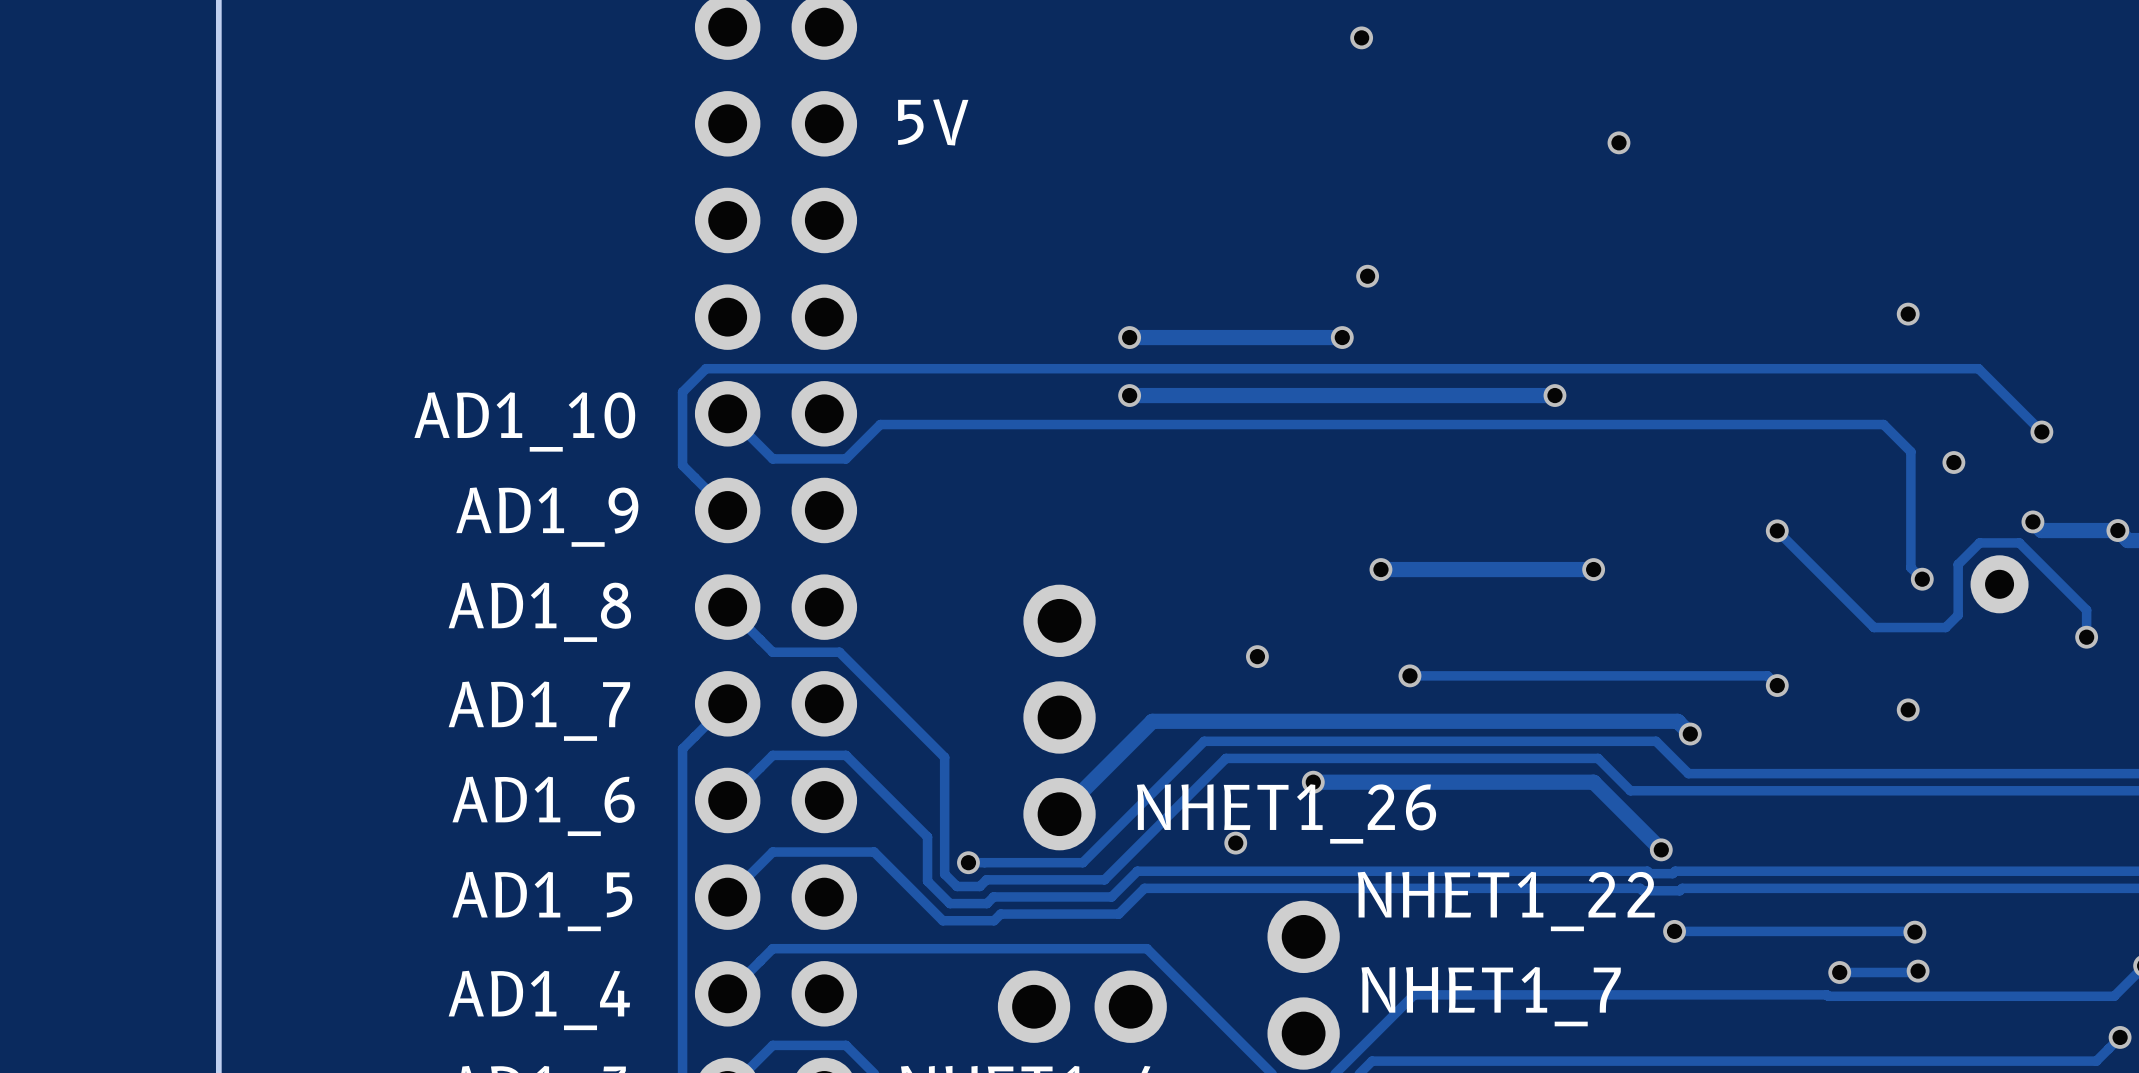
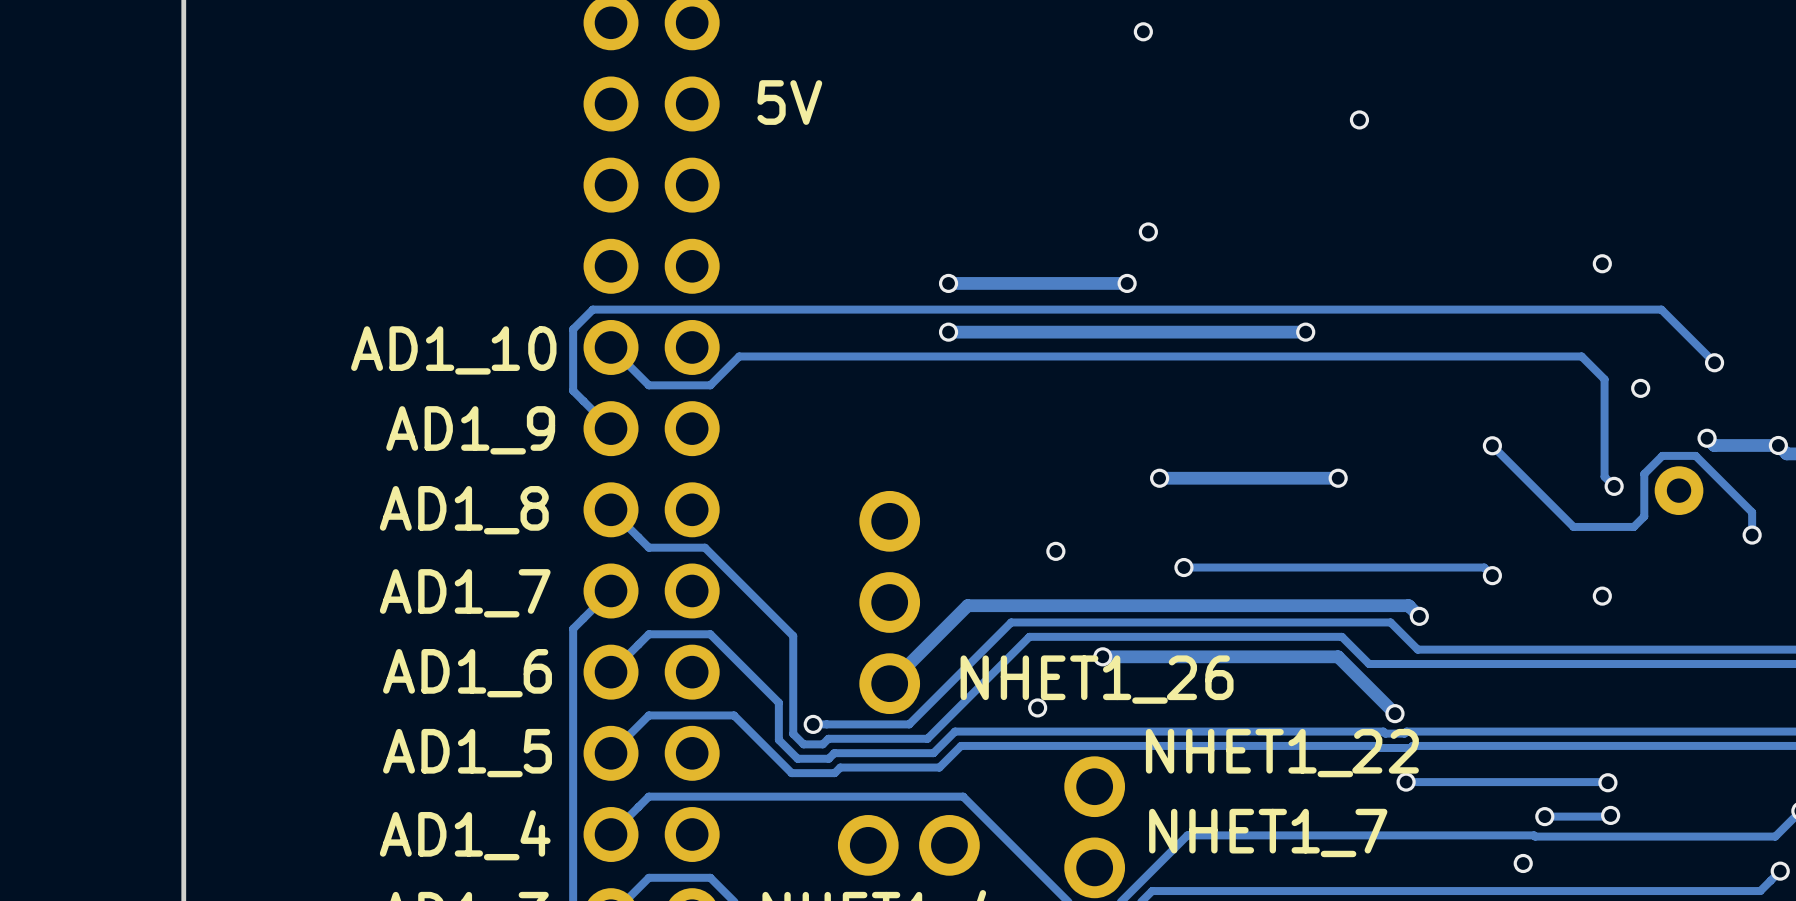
via: none -> (1523, 863)

